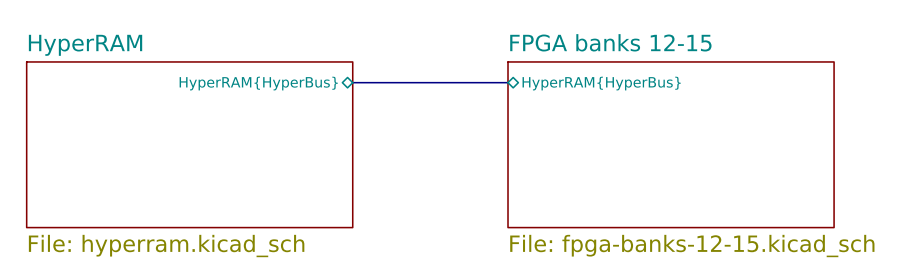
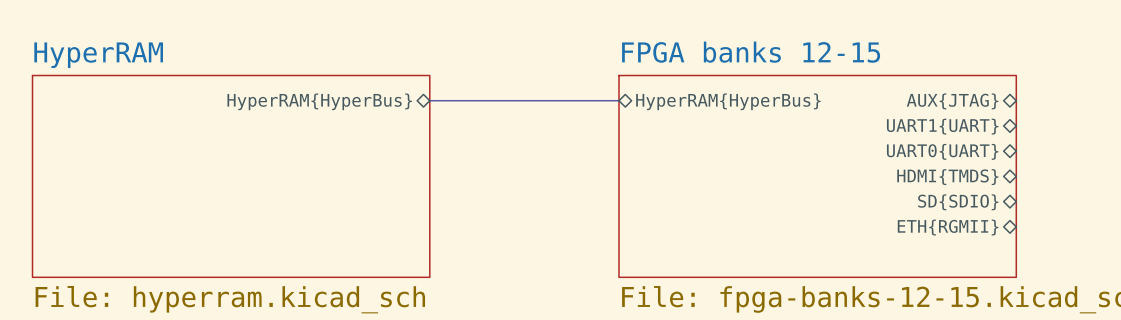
sheet pin: none -> AUX{JTAG} (952, 101)
sheet pin: none -> UART1{UART} (942, 126)
sheet pin: none -> UART0{UART} (942, 151)
sheet pin: none -> HDMI{TMDS} (947, 177)
sheet pin: none -> SD{SDIO} (958, 202)
sheet pin: none -> ETH{RGMII} (948, 227)

